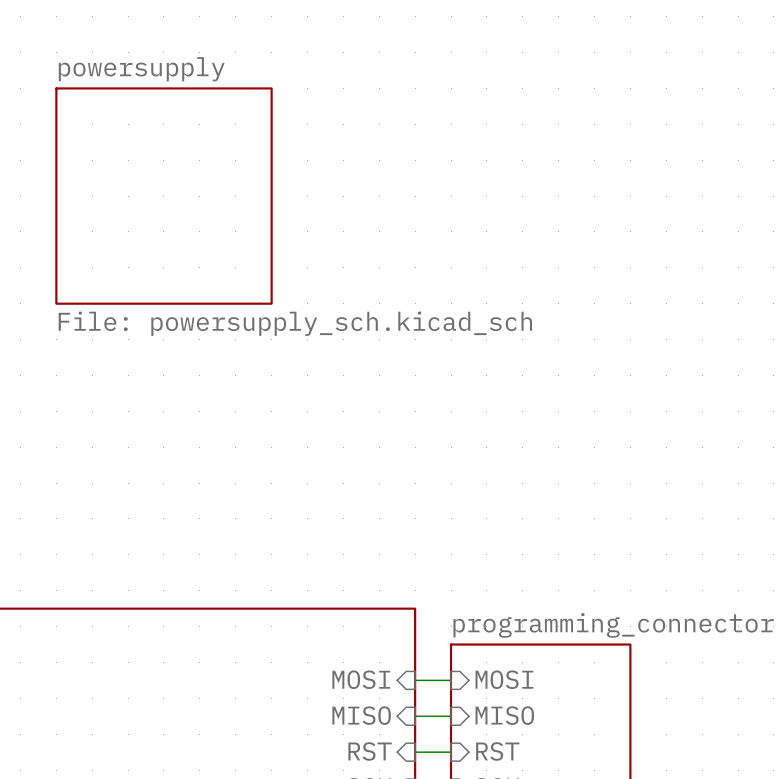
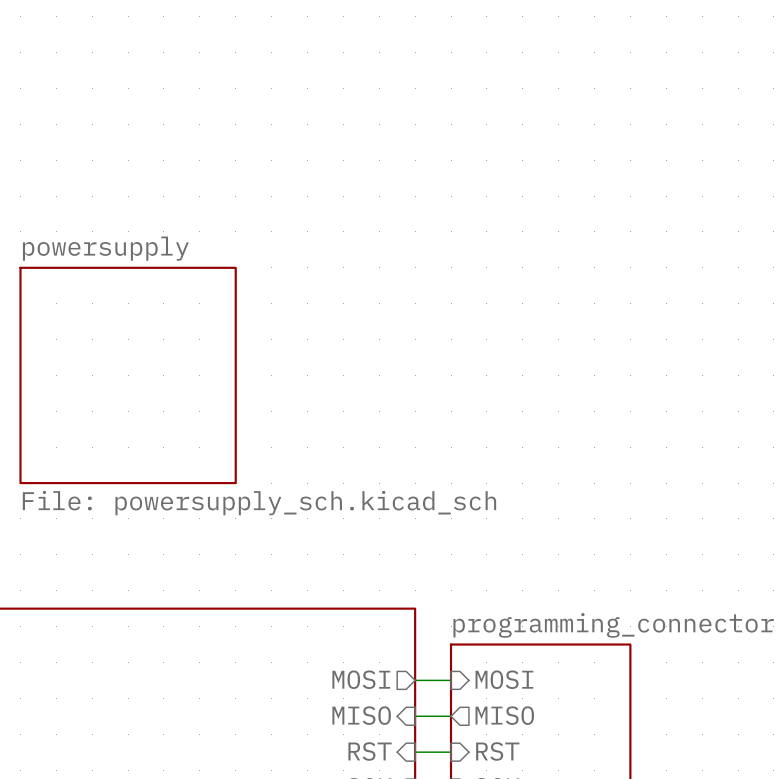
sheet powersupply position: (163, 196) -> (128, 375)
sheet pin shape: input (361, 679) -> output (361, 679)
sheet pin shape: input (504, 715) -> output (504, 715)

